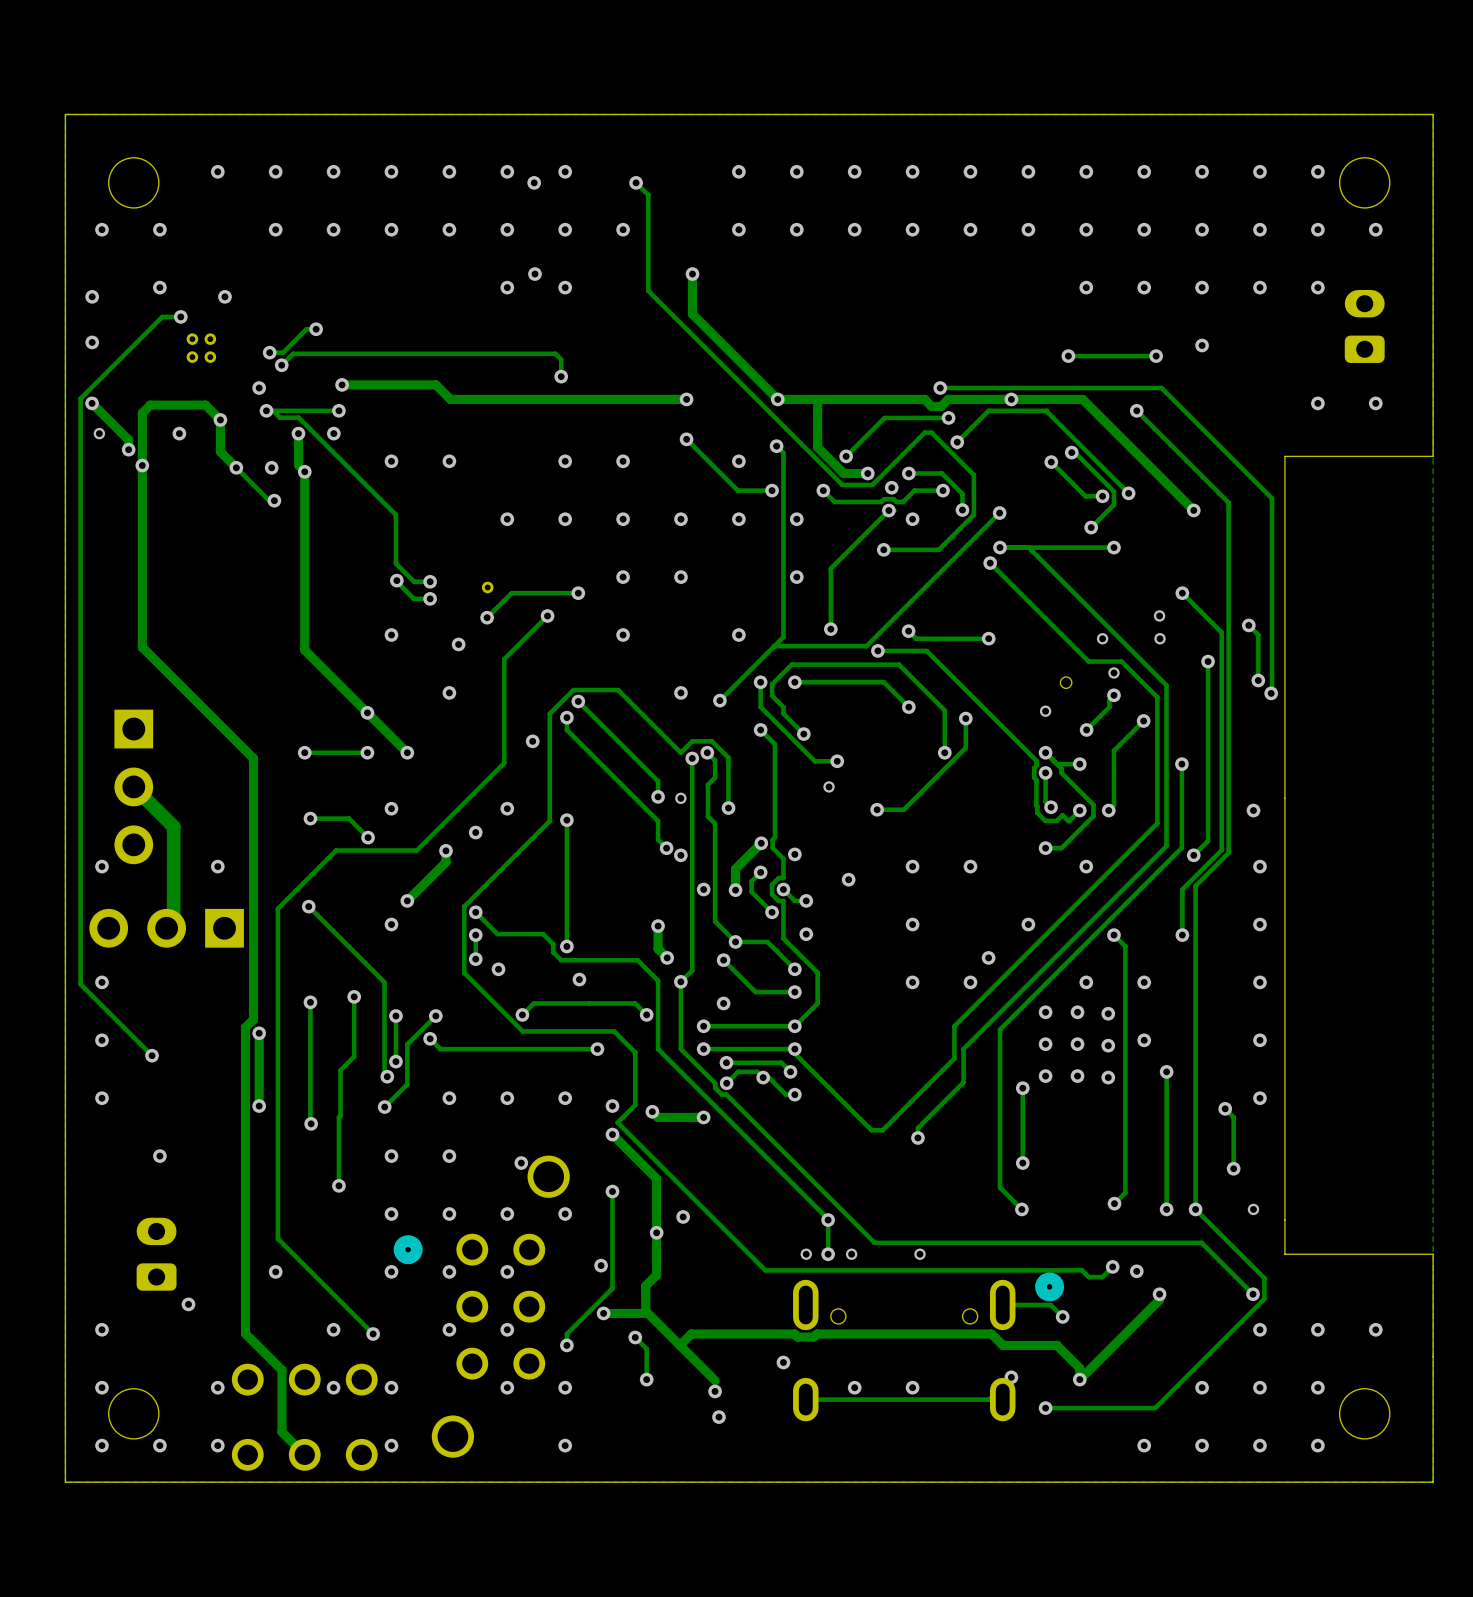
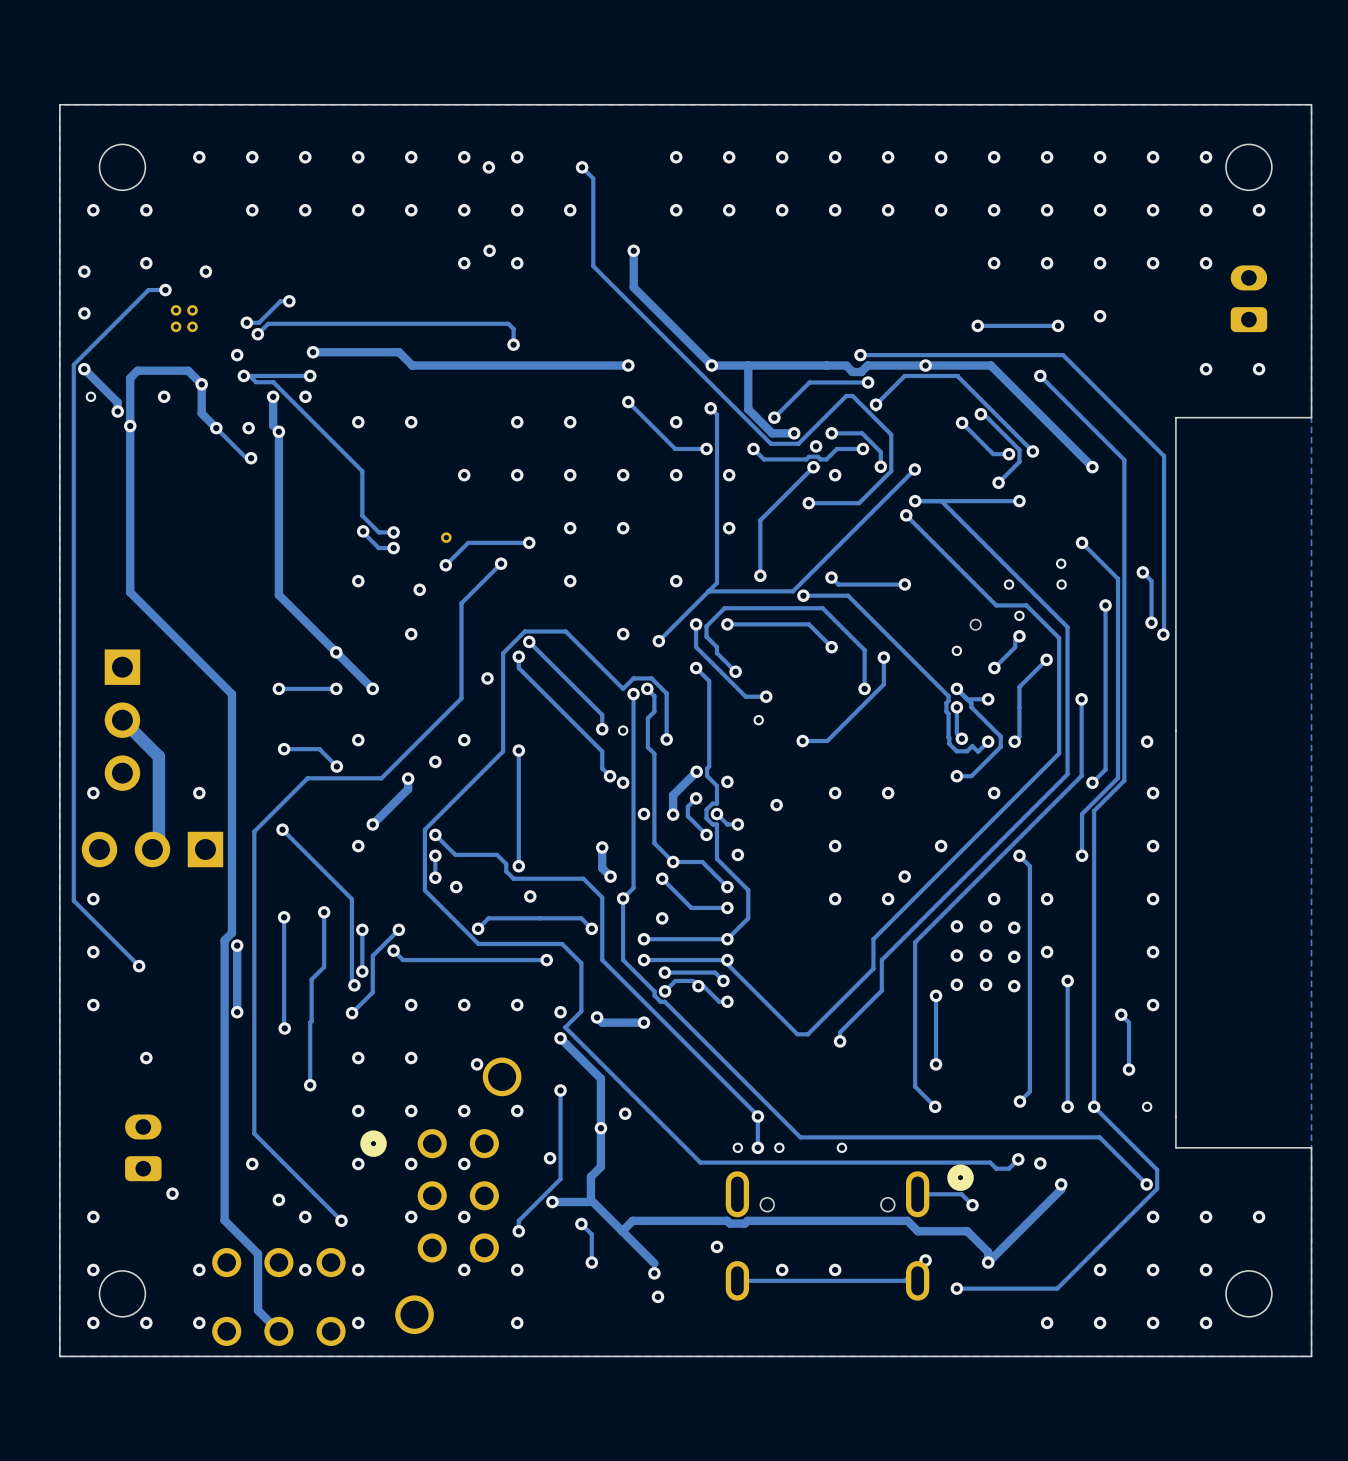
via: none -> (278, 1199)

